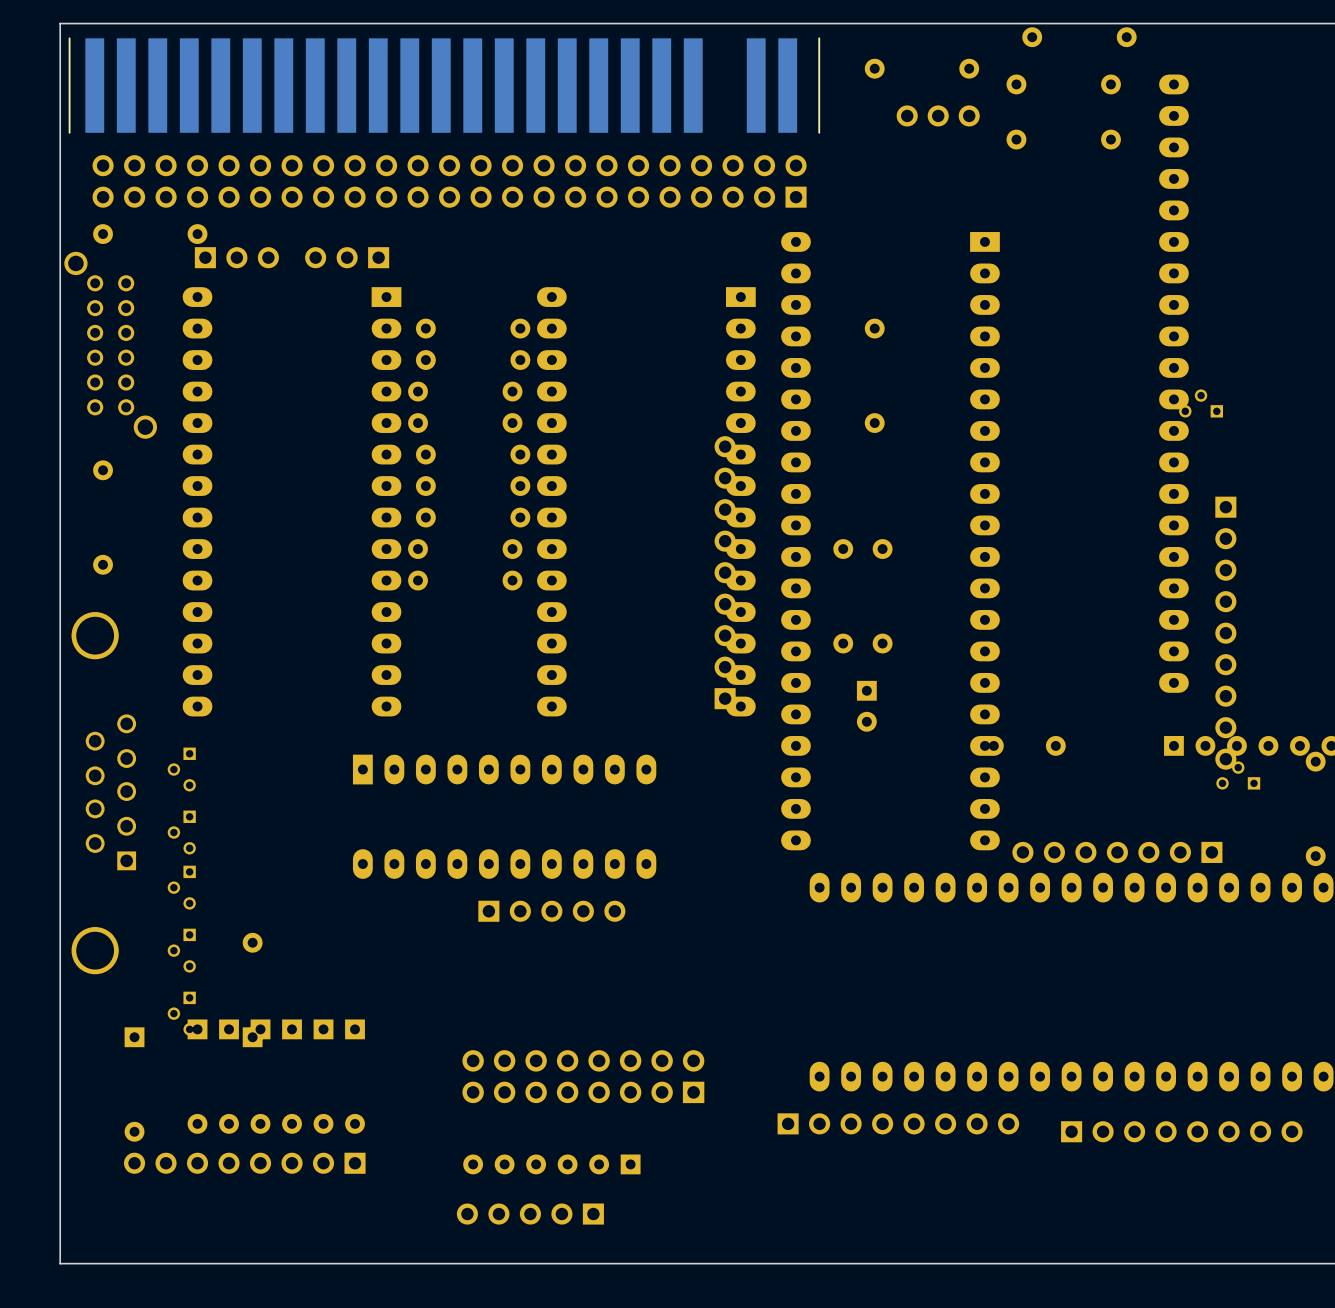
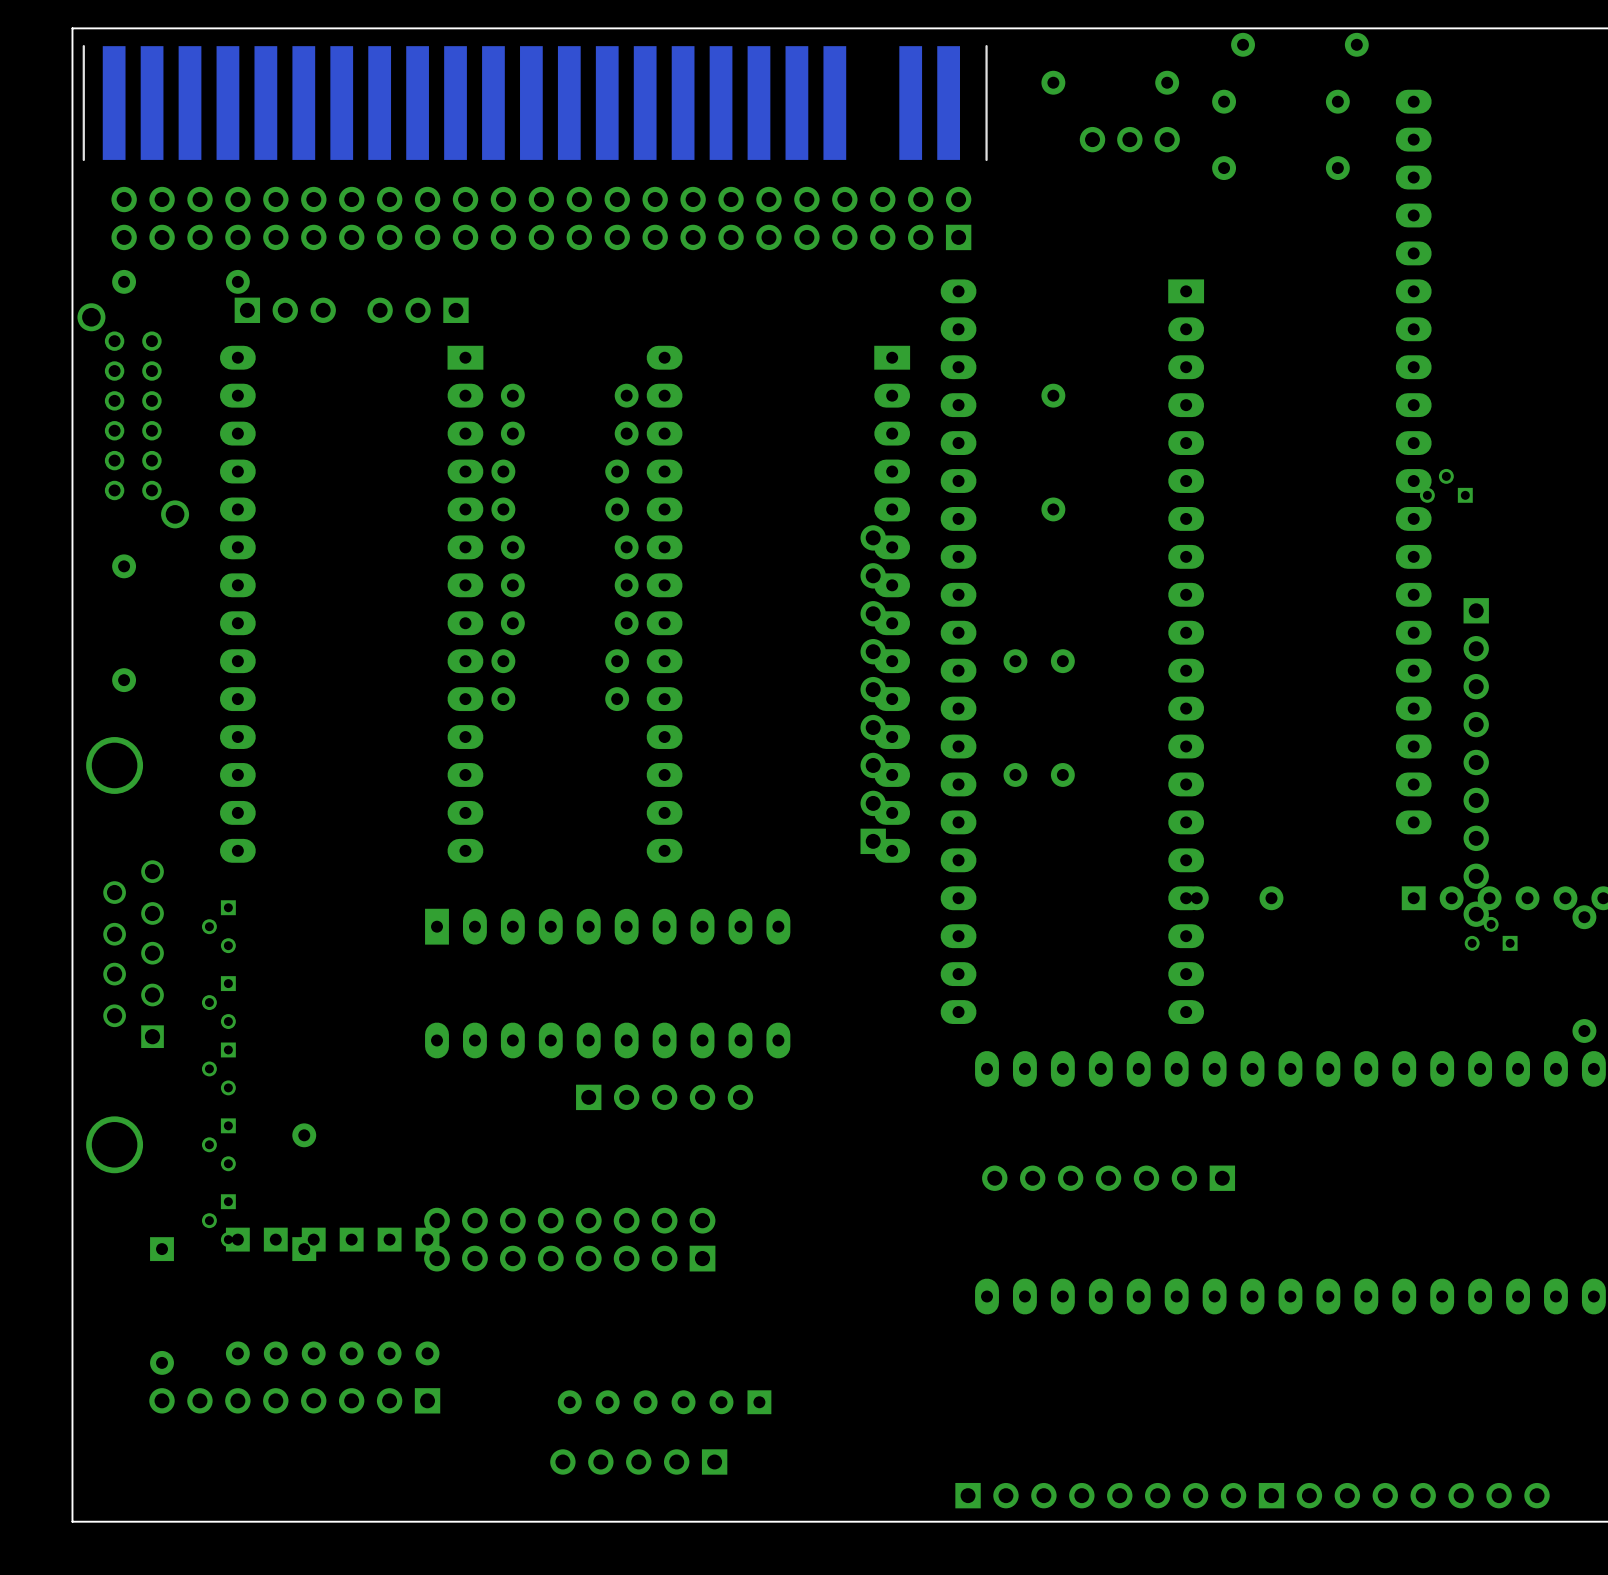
part: (866, 706) -> none
part position: (1117, 852) -> (1108, 1178)
part position: (583, 1076) -> (569, 1239)
part position: (898, 1123) -> (1100, 1495)
part position: (1181, 1131) -> (1404, 1495)

